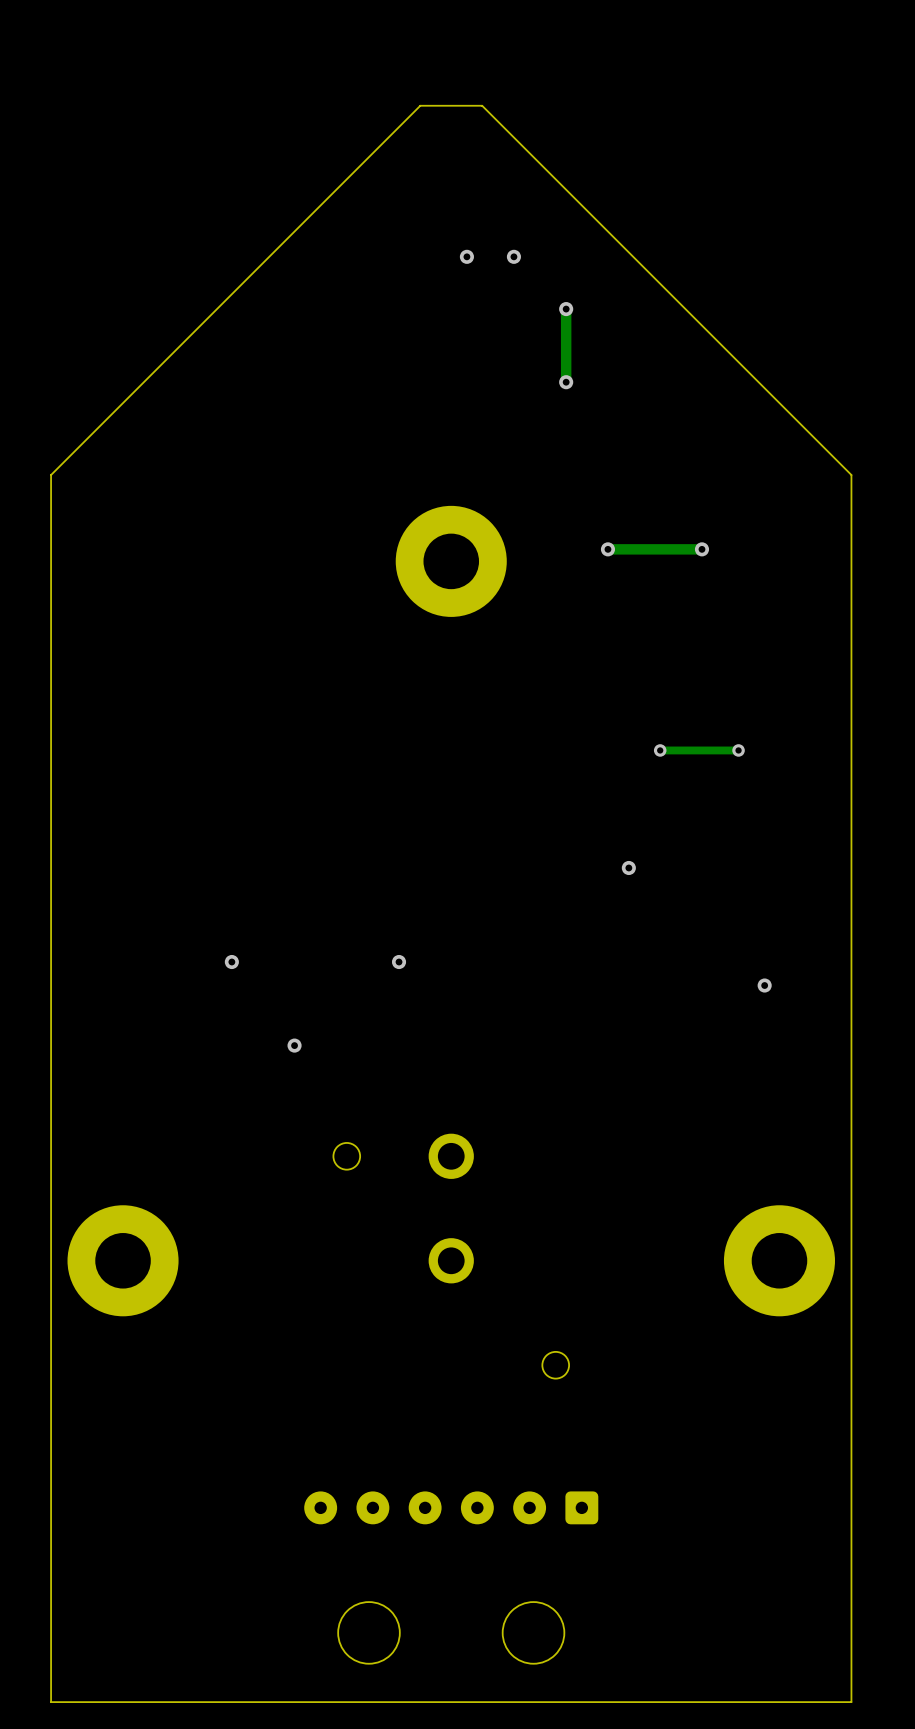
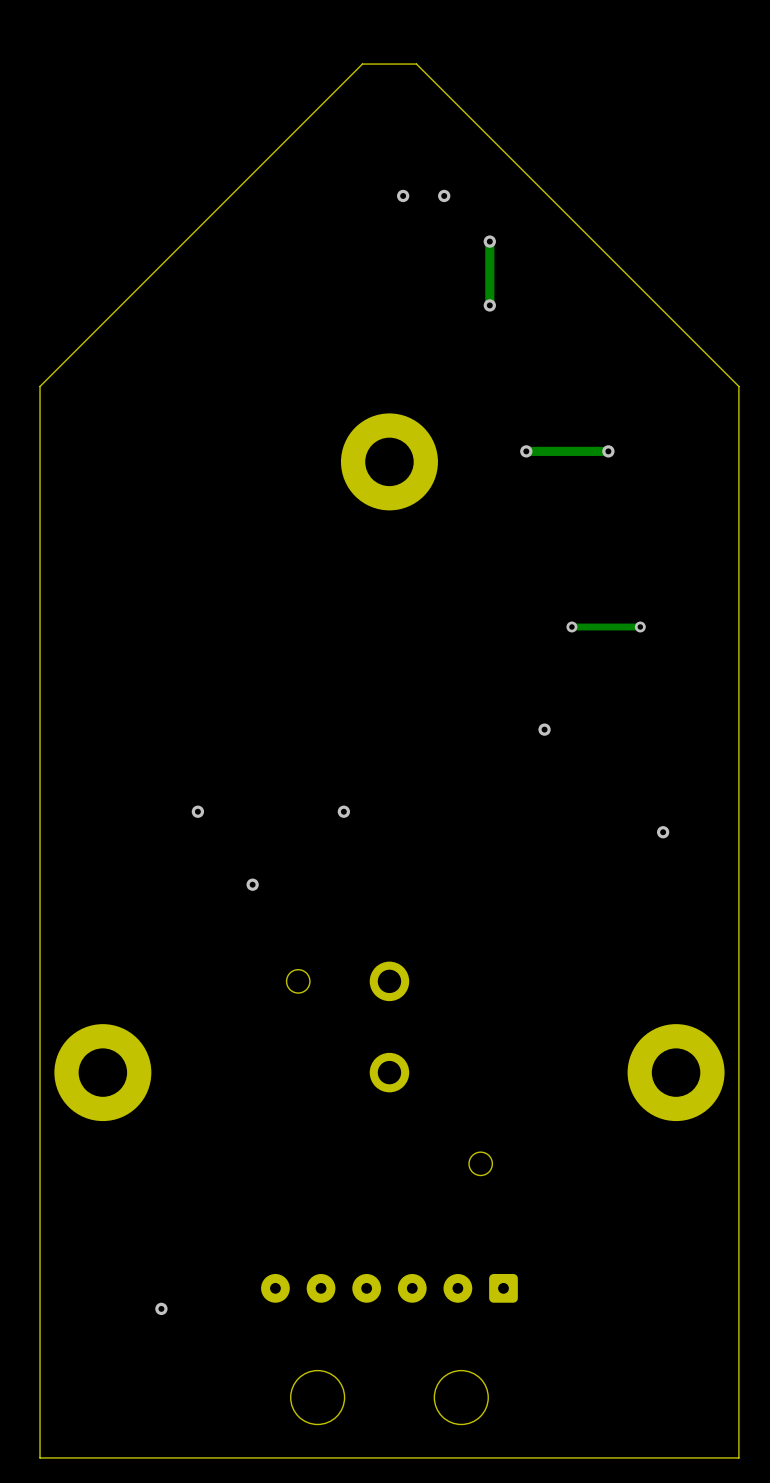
via: none -> (161, 1308)

